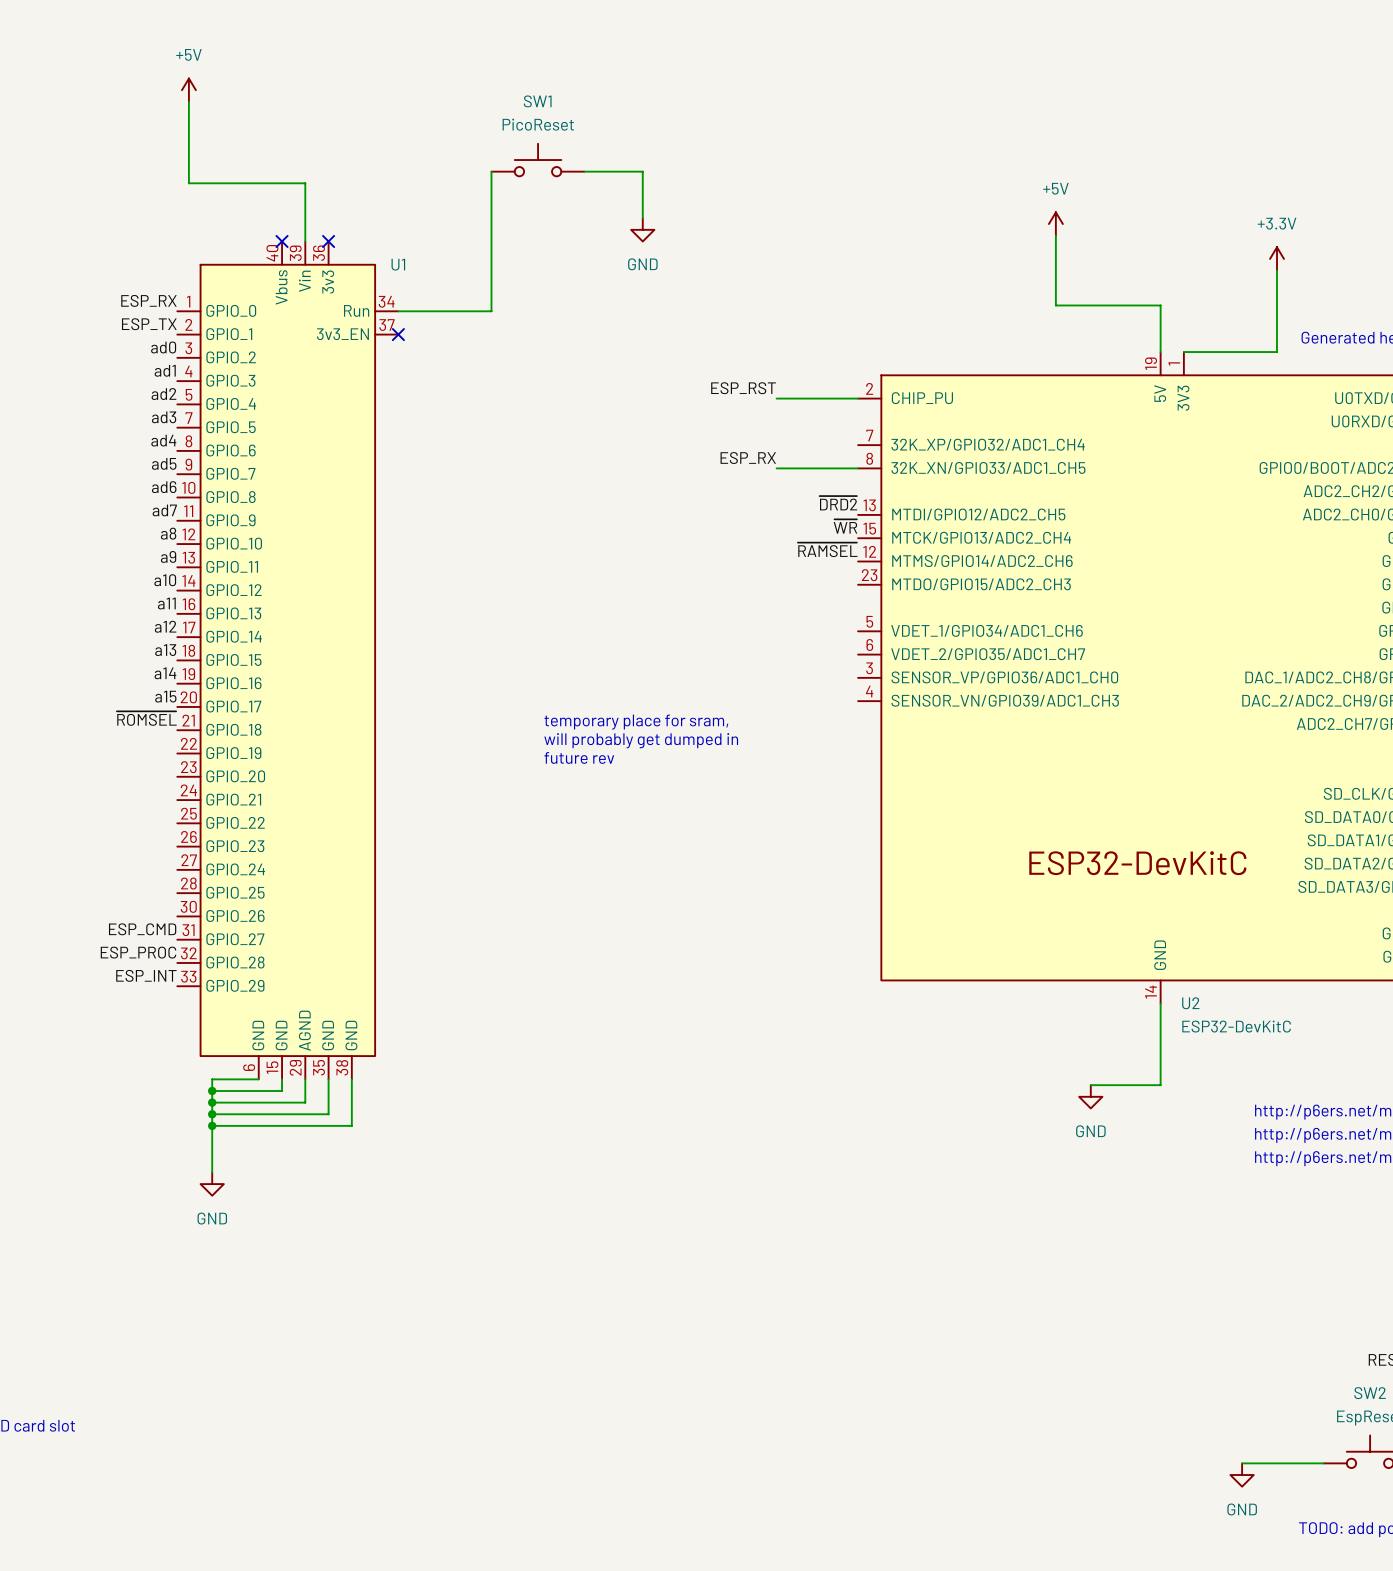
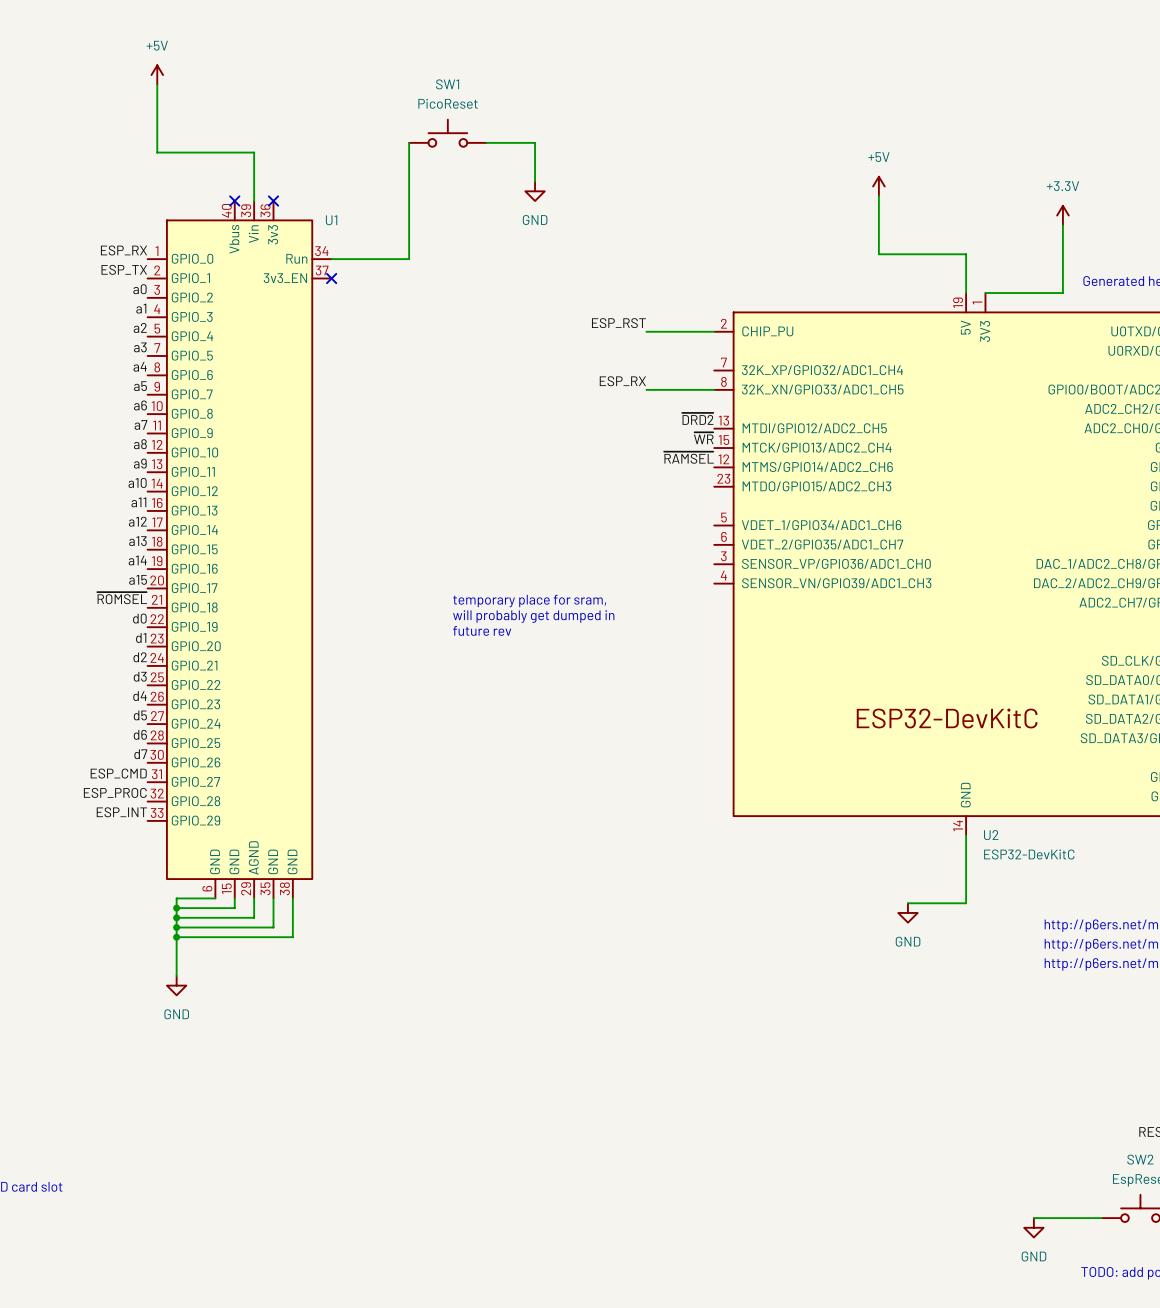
label: ad0 (163, 347) -> a0 (139, 289)
label: ad1 (165, 370) -> a1 (141, 308)
label: ad2 (163, 394) -> a2 (140, 327)
label: ad3 (164, 417) -> a3 (140, 347)
label: ad4 (163, 440) -> a4 (140, 366)
label: ad5 (164, 463) -> a5 (140, 386)
label: ad6 (164, 487) -> a6 (140, 405)
label: ad7 (164, 510) -> a7 (140, 424)
label: none -> d0 (139, 618)
label: none -> d1 (141, 638)
label: none -> d2 (140, 657)
label: none -> d3 (140, 676)
label: none -> d4 (140, 696)
label: none -> d5 (140, 715)
label: none -> d6 (140, 734)
label: none -> d7 (140, 754)

